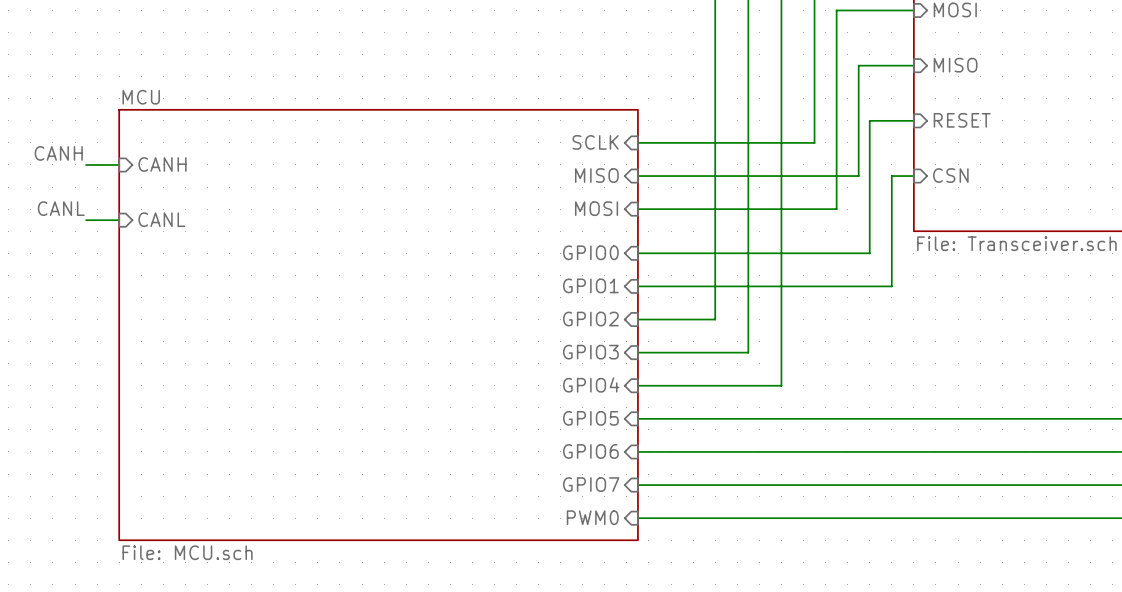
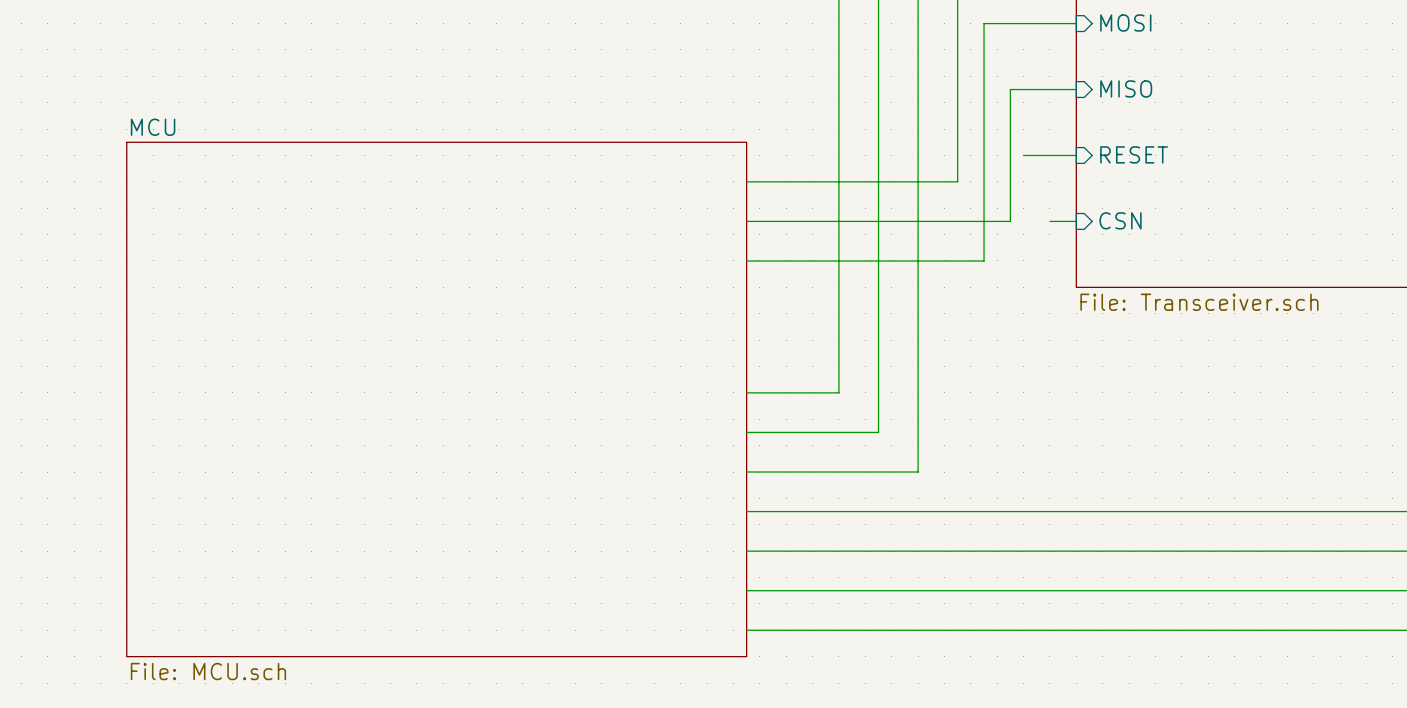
wire: (869, 120) (869, 253) (637, 253) -> none
sheet pin: SCLK (595, 142) -> none
label: CANH (58, 153) -> none
wire: (86, 164) (119, 164) -> none
sheet pin: CANH (162, 164) -> none
sheet pin: MISO (596, 175) -> none
wire: (891, 176) (891, 286) (637, 286) -> none
label: CANL (61, 208) -> none
sheet pin: MOSI (596, 208) -> none
sheet pin: CANL (161, 219) -> none
wire: (86, 220) (119, 220) -> none
sheet pin: GPIO0 (590, 252) -> none
sheet pin: GPIO1 (590, 285) -> none
sheet pin: GPIO2 (590, 319) -> none
sheet pin: GPIO3 (590, 352) -> none
sheet pin: GPIO4 (591, 384) -> none
sheet pin: GPIO5 (590, 418) -> none
sheet pin: GPIO6 (590, 451) -> none
sheet pin: GPIO7 (591, 484) -> none
sheet pin: PWM0 (592, 517) -> none

